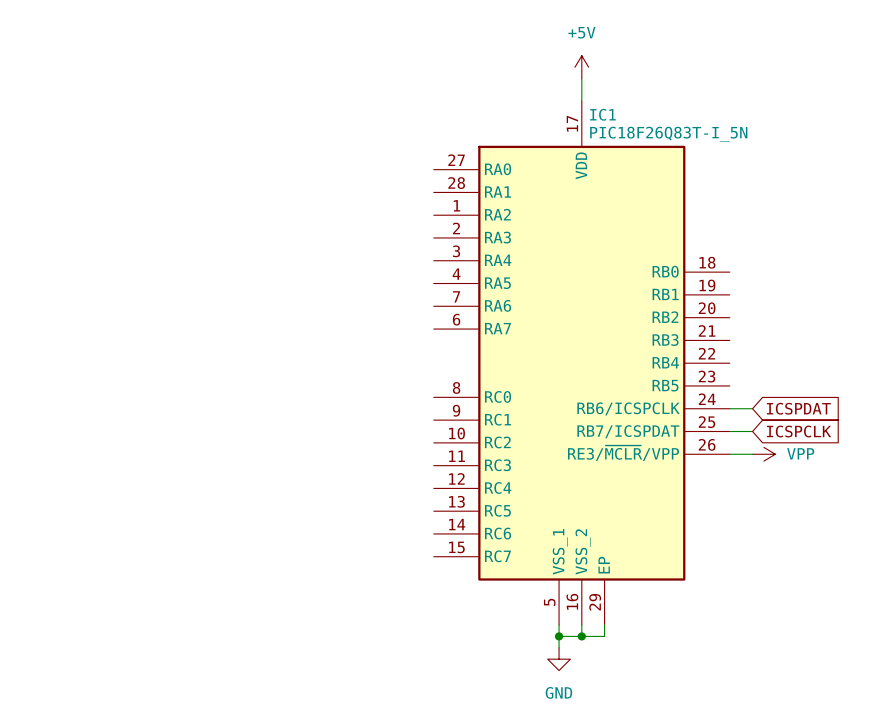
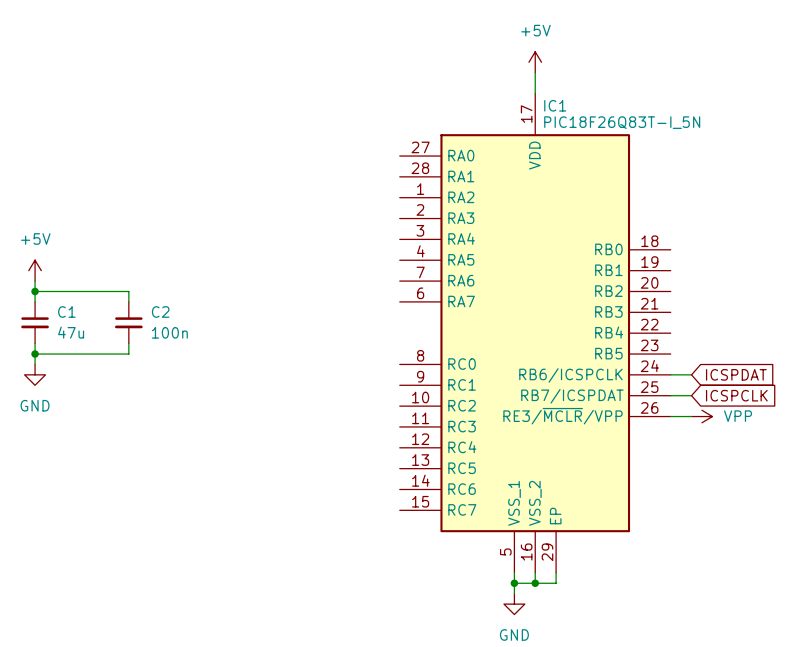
power symbol: none -> +5V (35, 270)
wire: none -> (35, 281) (35, 301)
wire: none -> (35, 291) (128, 291) (128, 301)
junction: none -> (35, 291)
C1: none -> 47u (35, 322)
C2: none -> 100n (128, 322)
wire: none -> (35, 343) (35, 364)
wire: none -> (128, 343) (128, 354) (35, 354)
junction: none -> (35, 354)
power symbol: none -> GND (35, 374)

